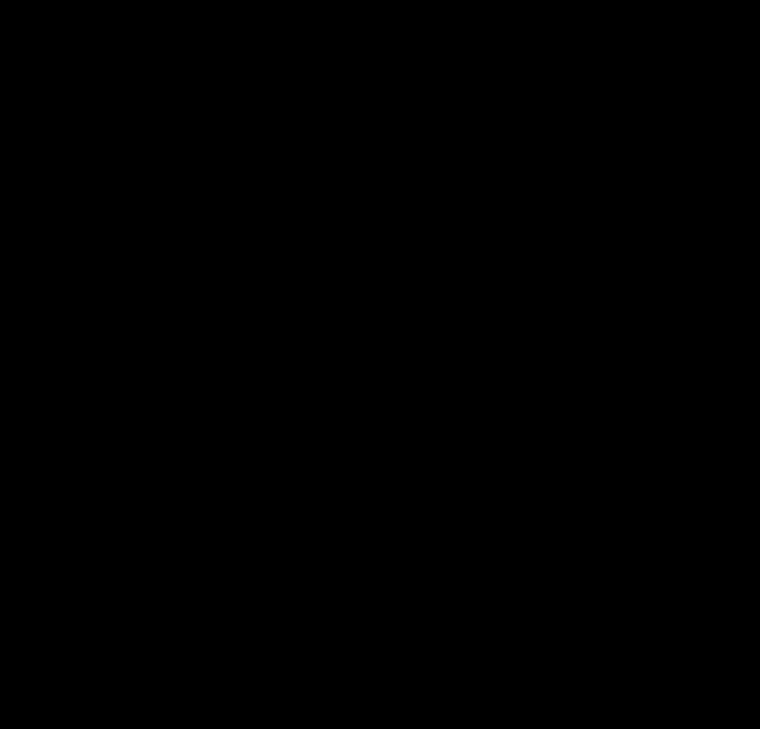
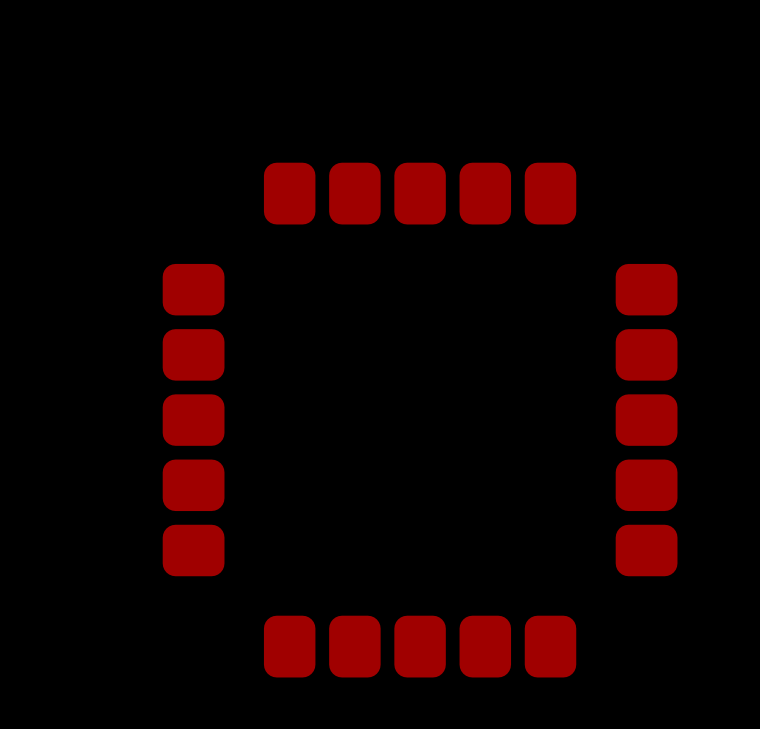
part: none -> (420, 420)

